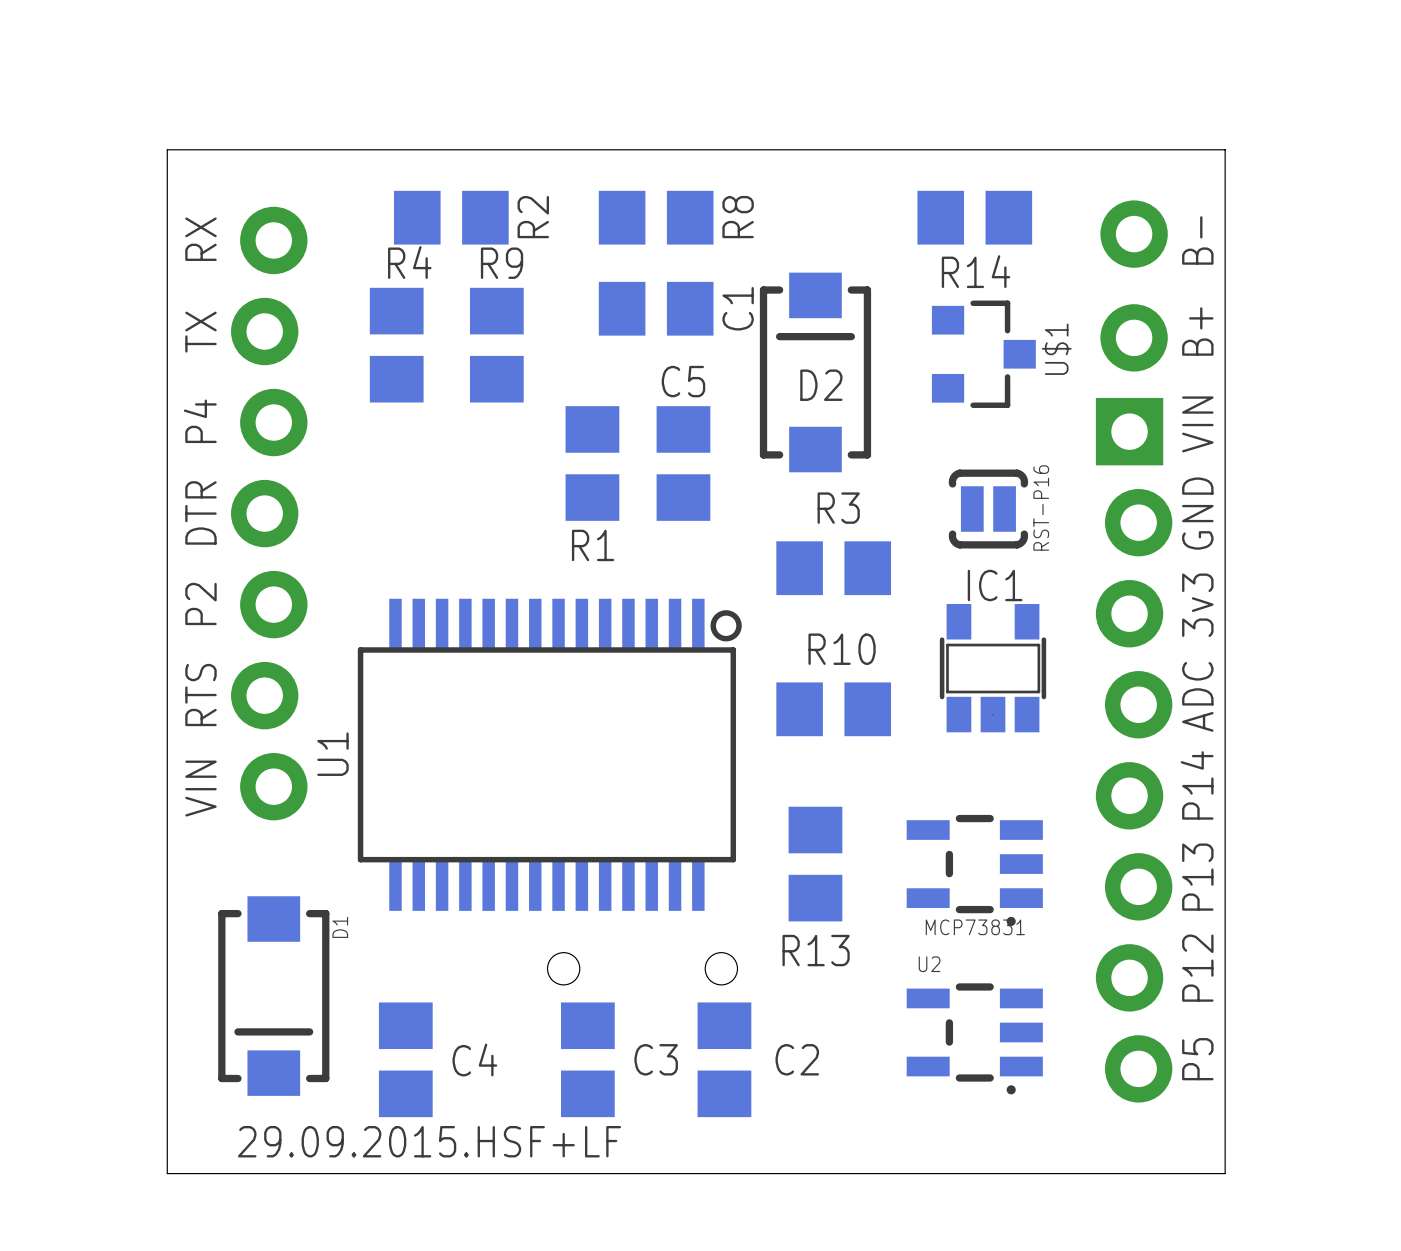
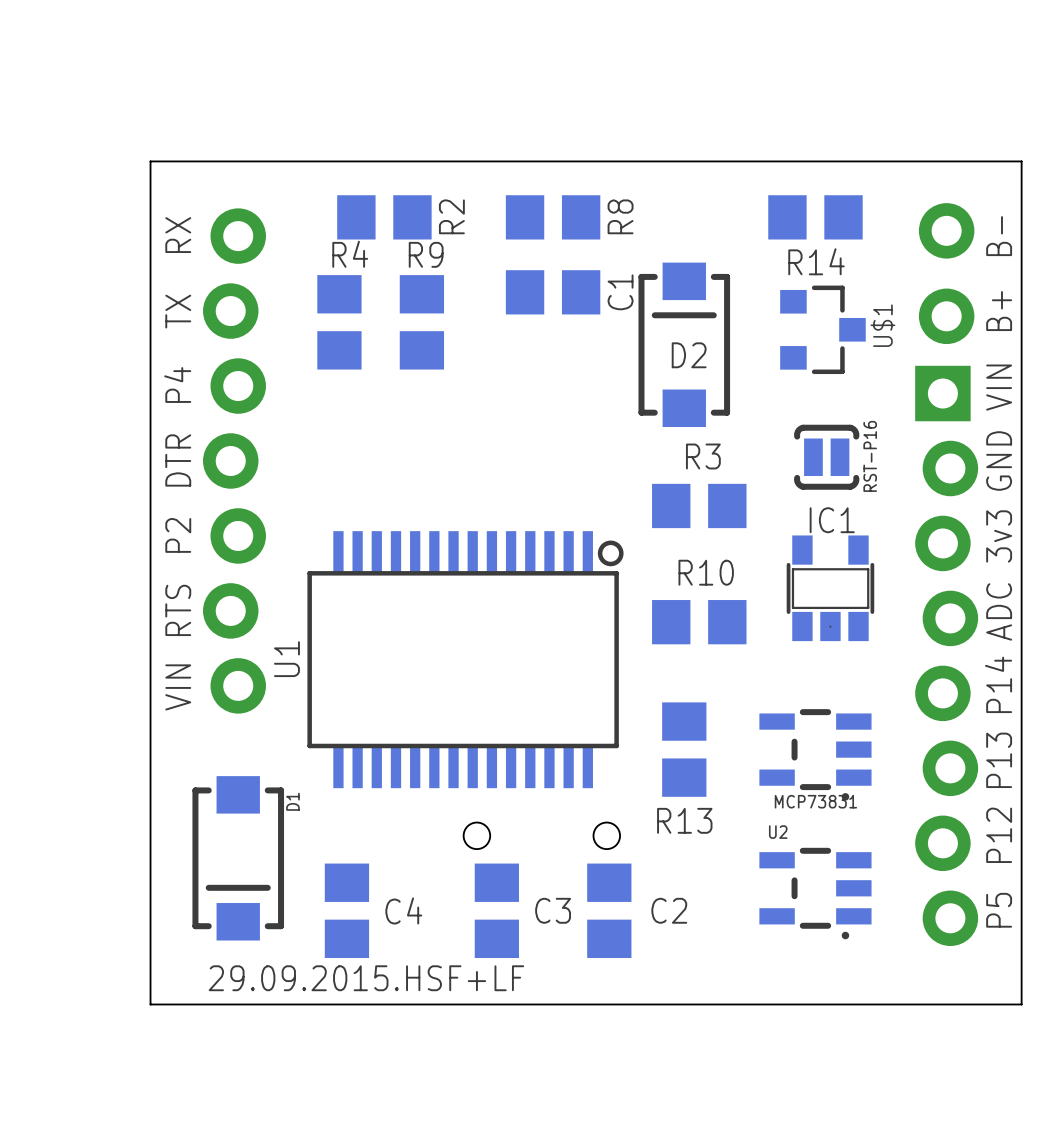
R1: (592, 463) -> none
C5: (683, 463) -> none

